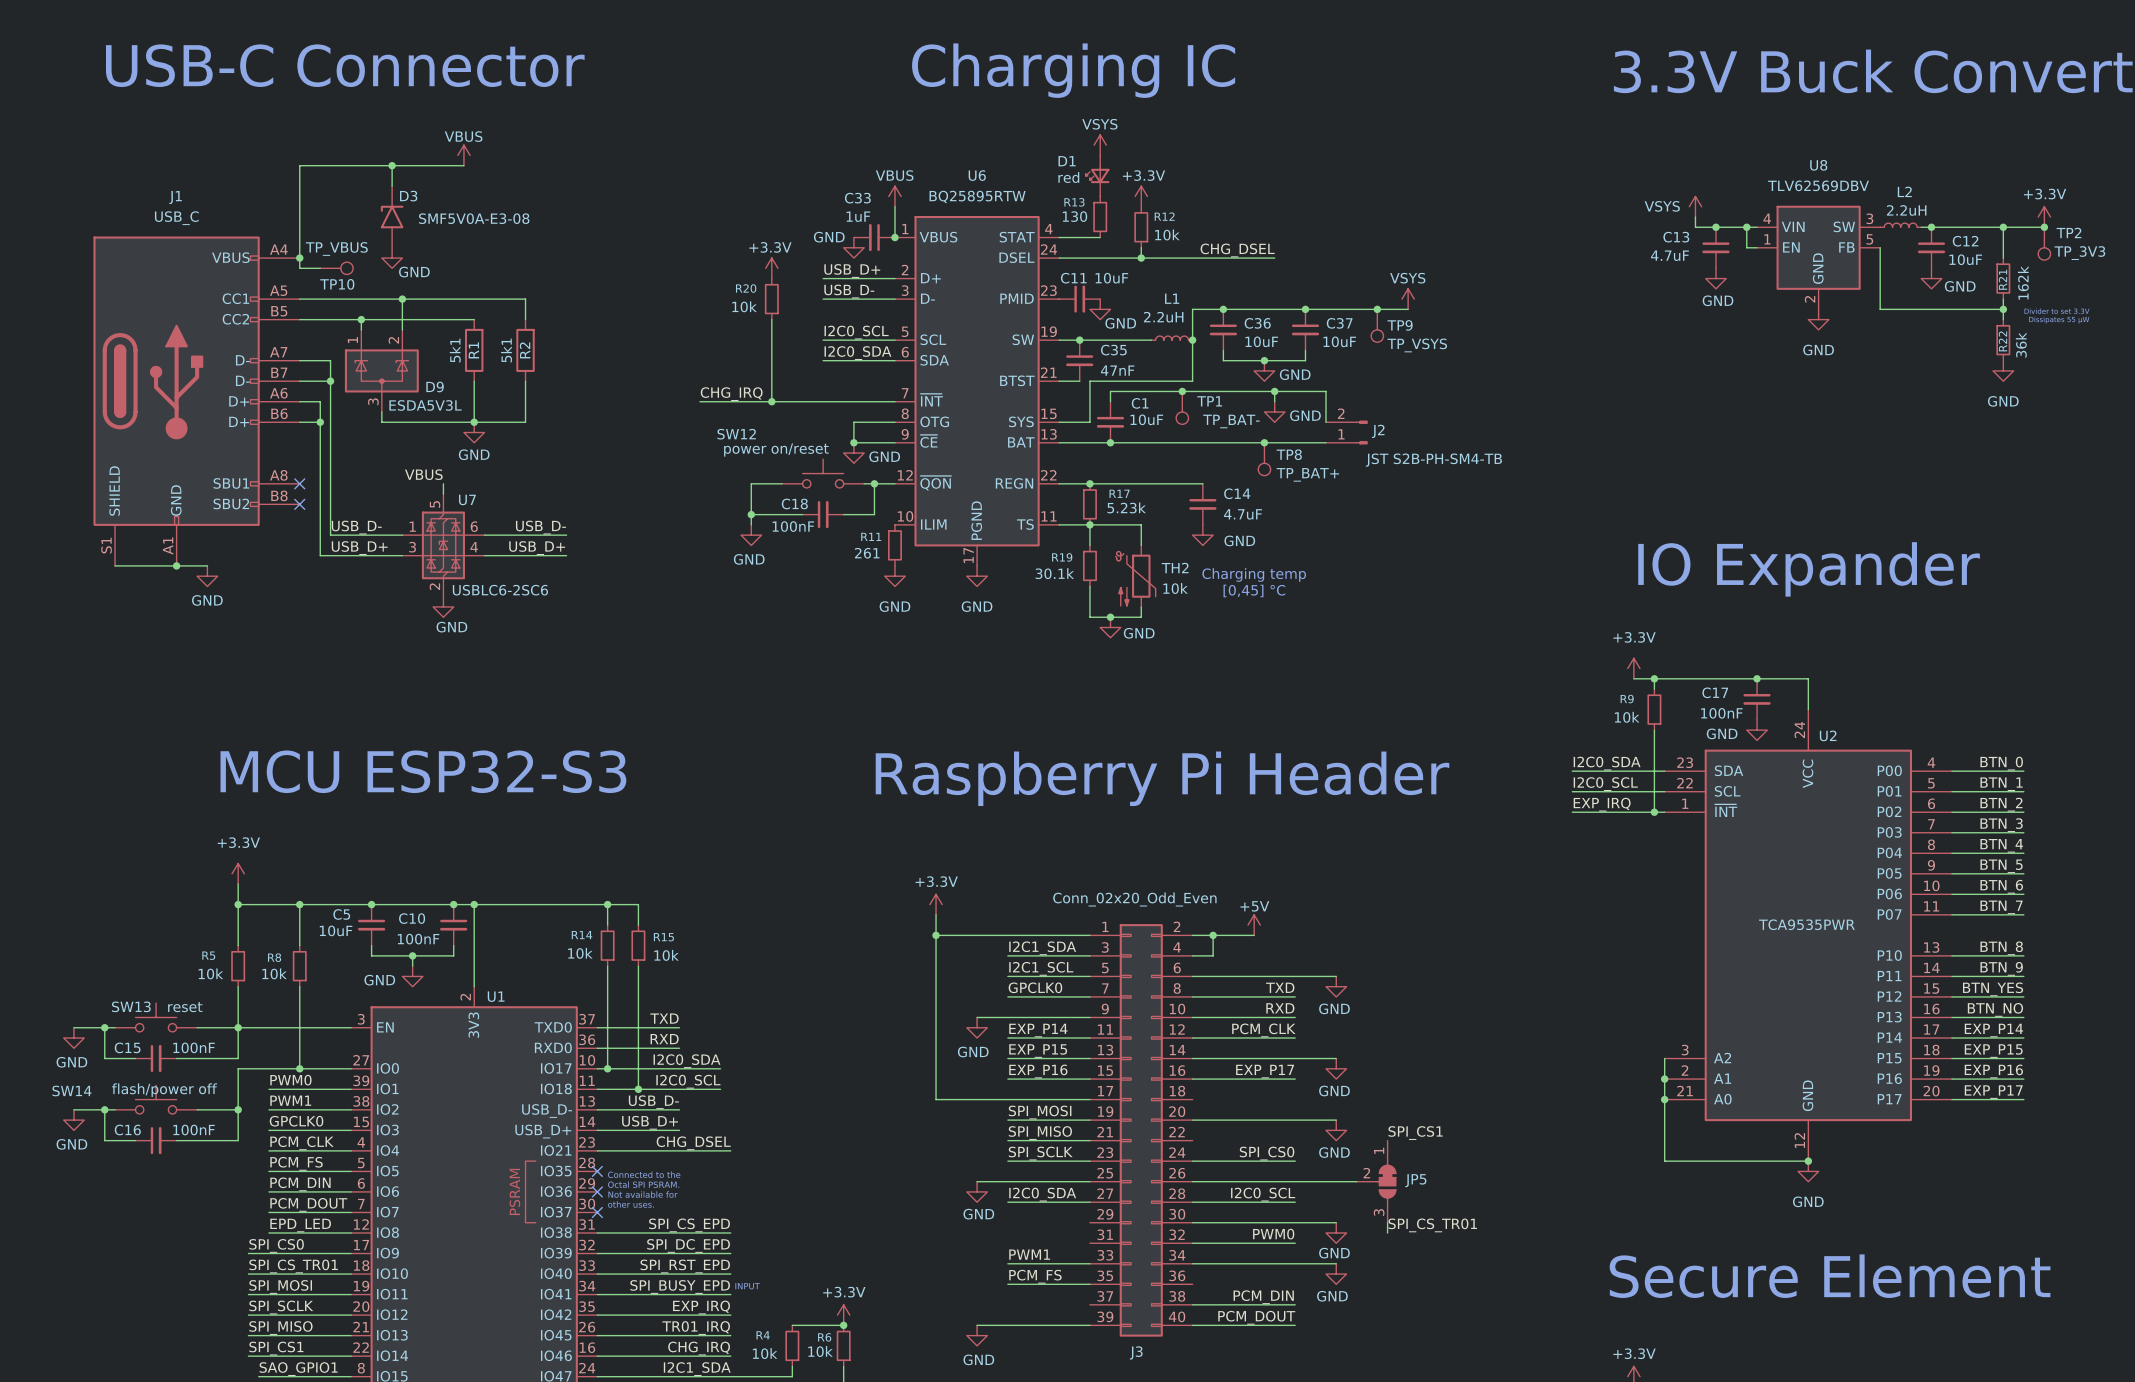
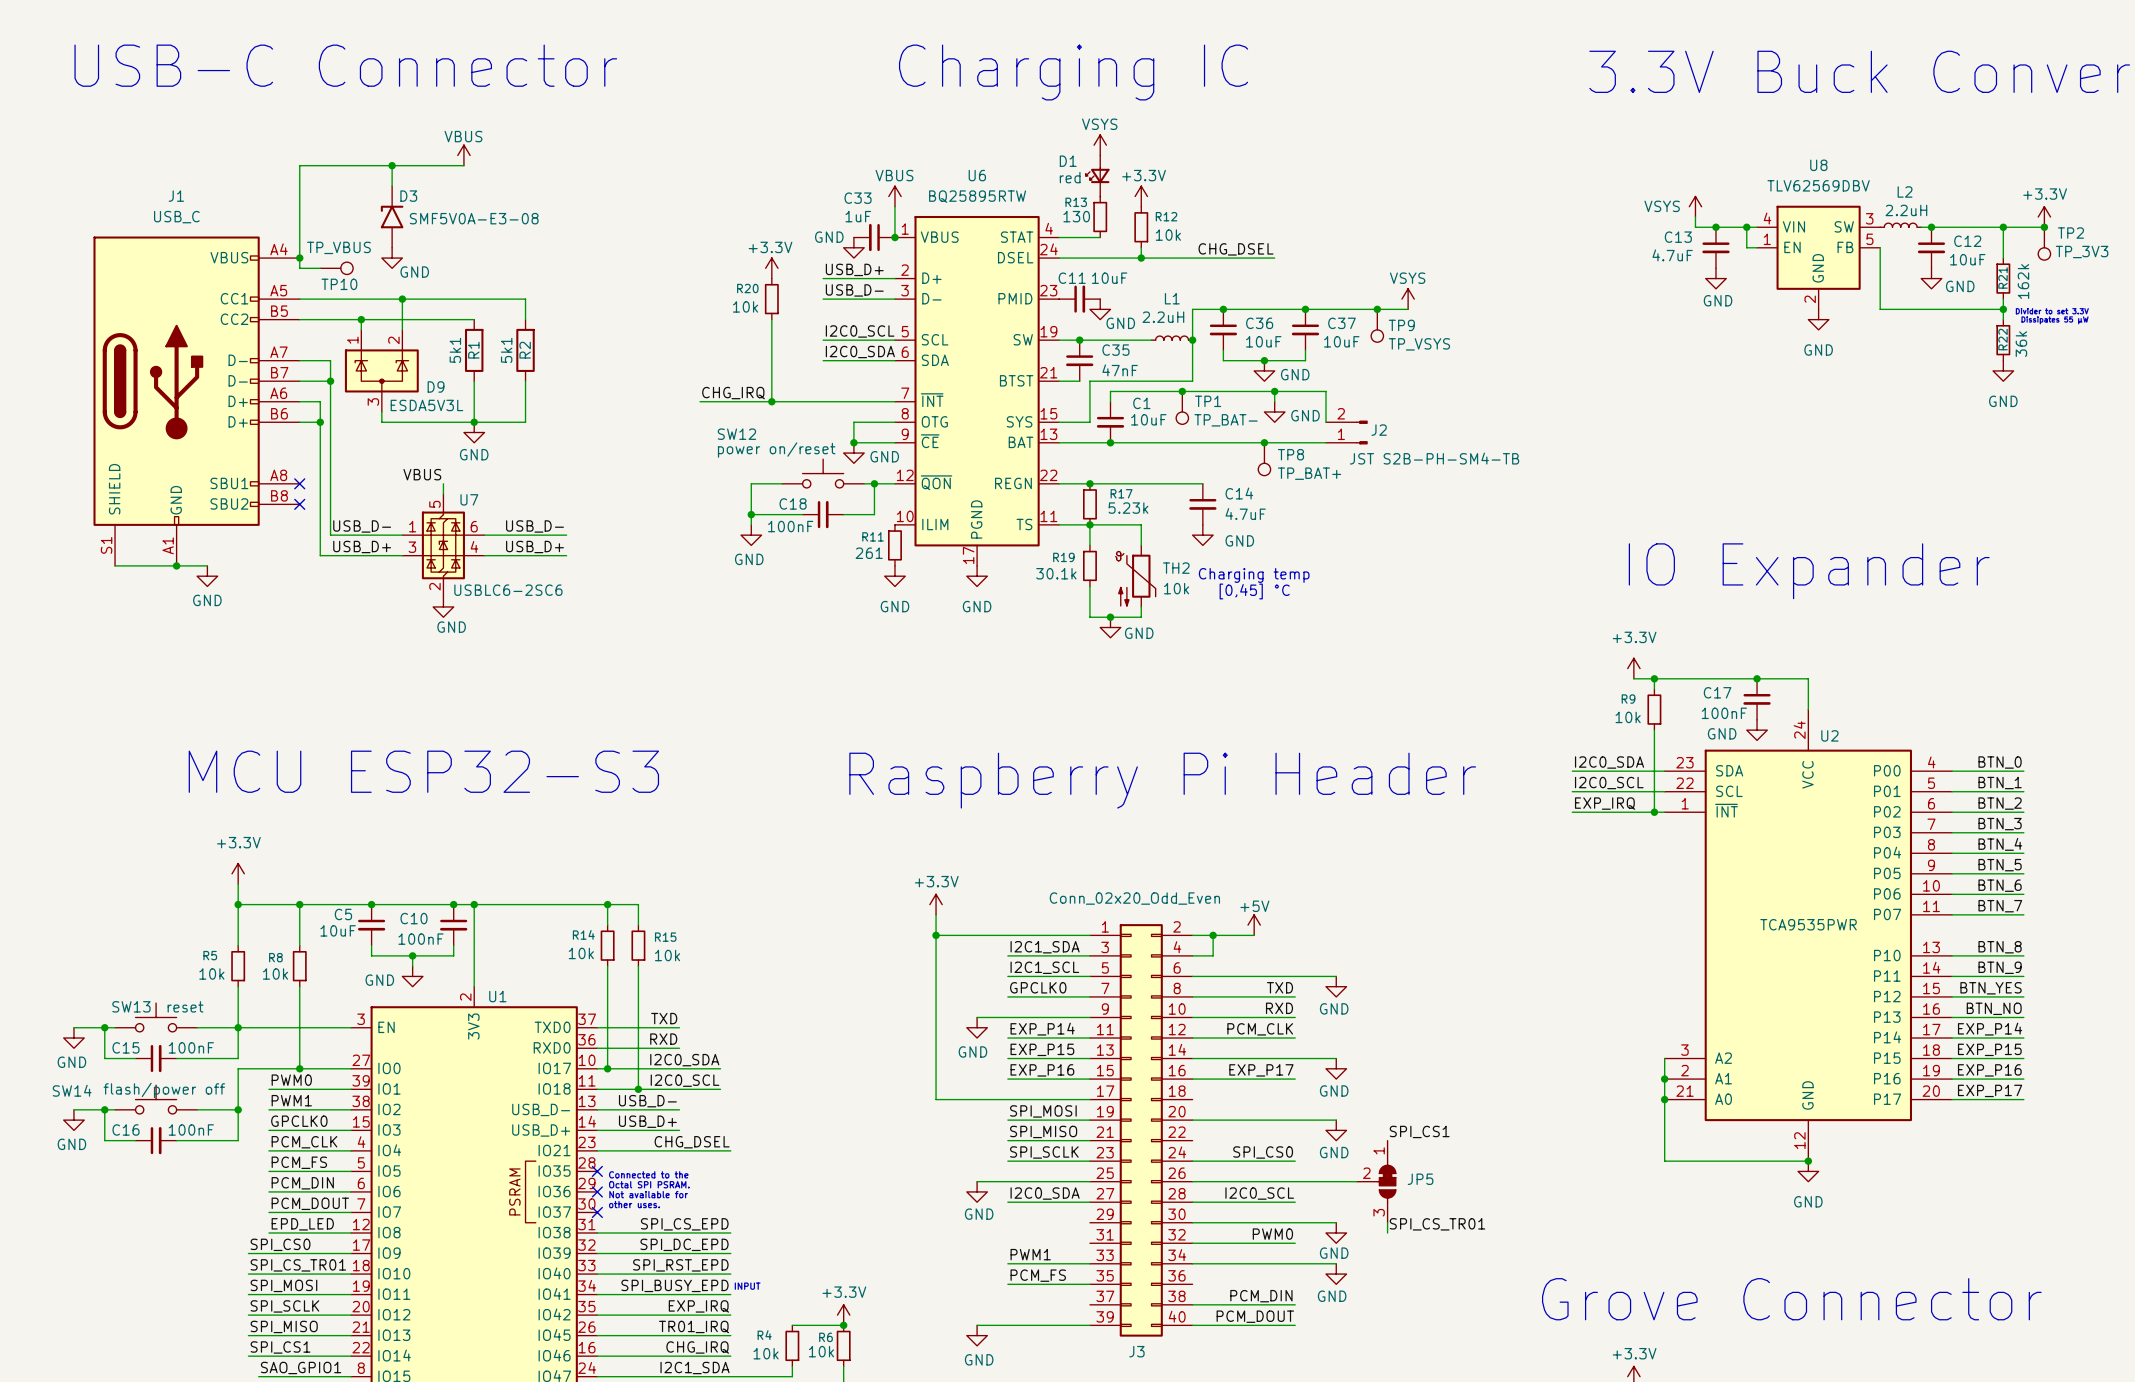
text: Secure Element (1830, 1276) -> none
text: none -> Grove Connector (1791, 1299)

